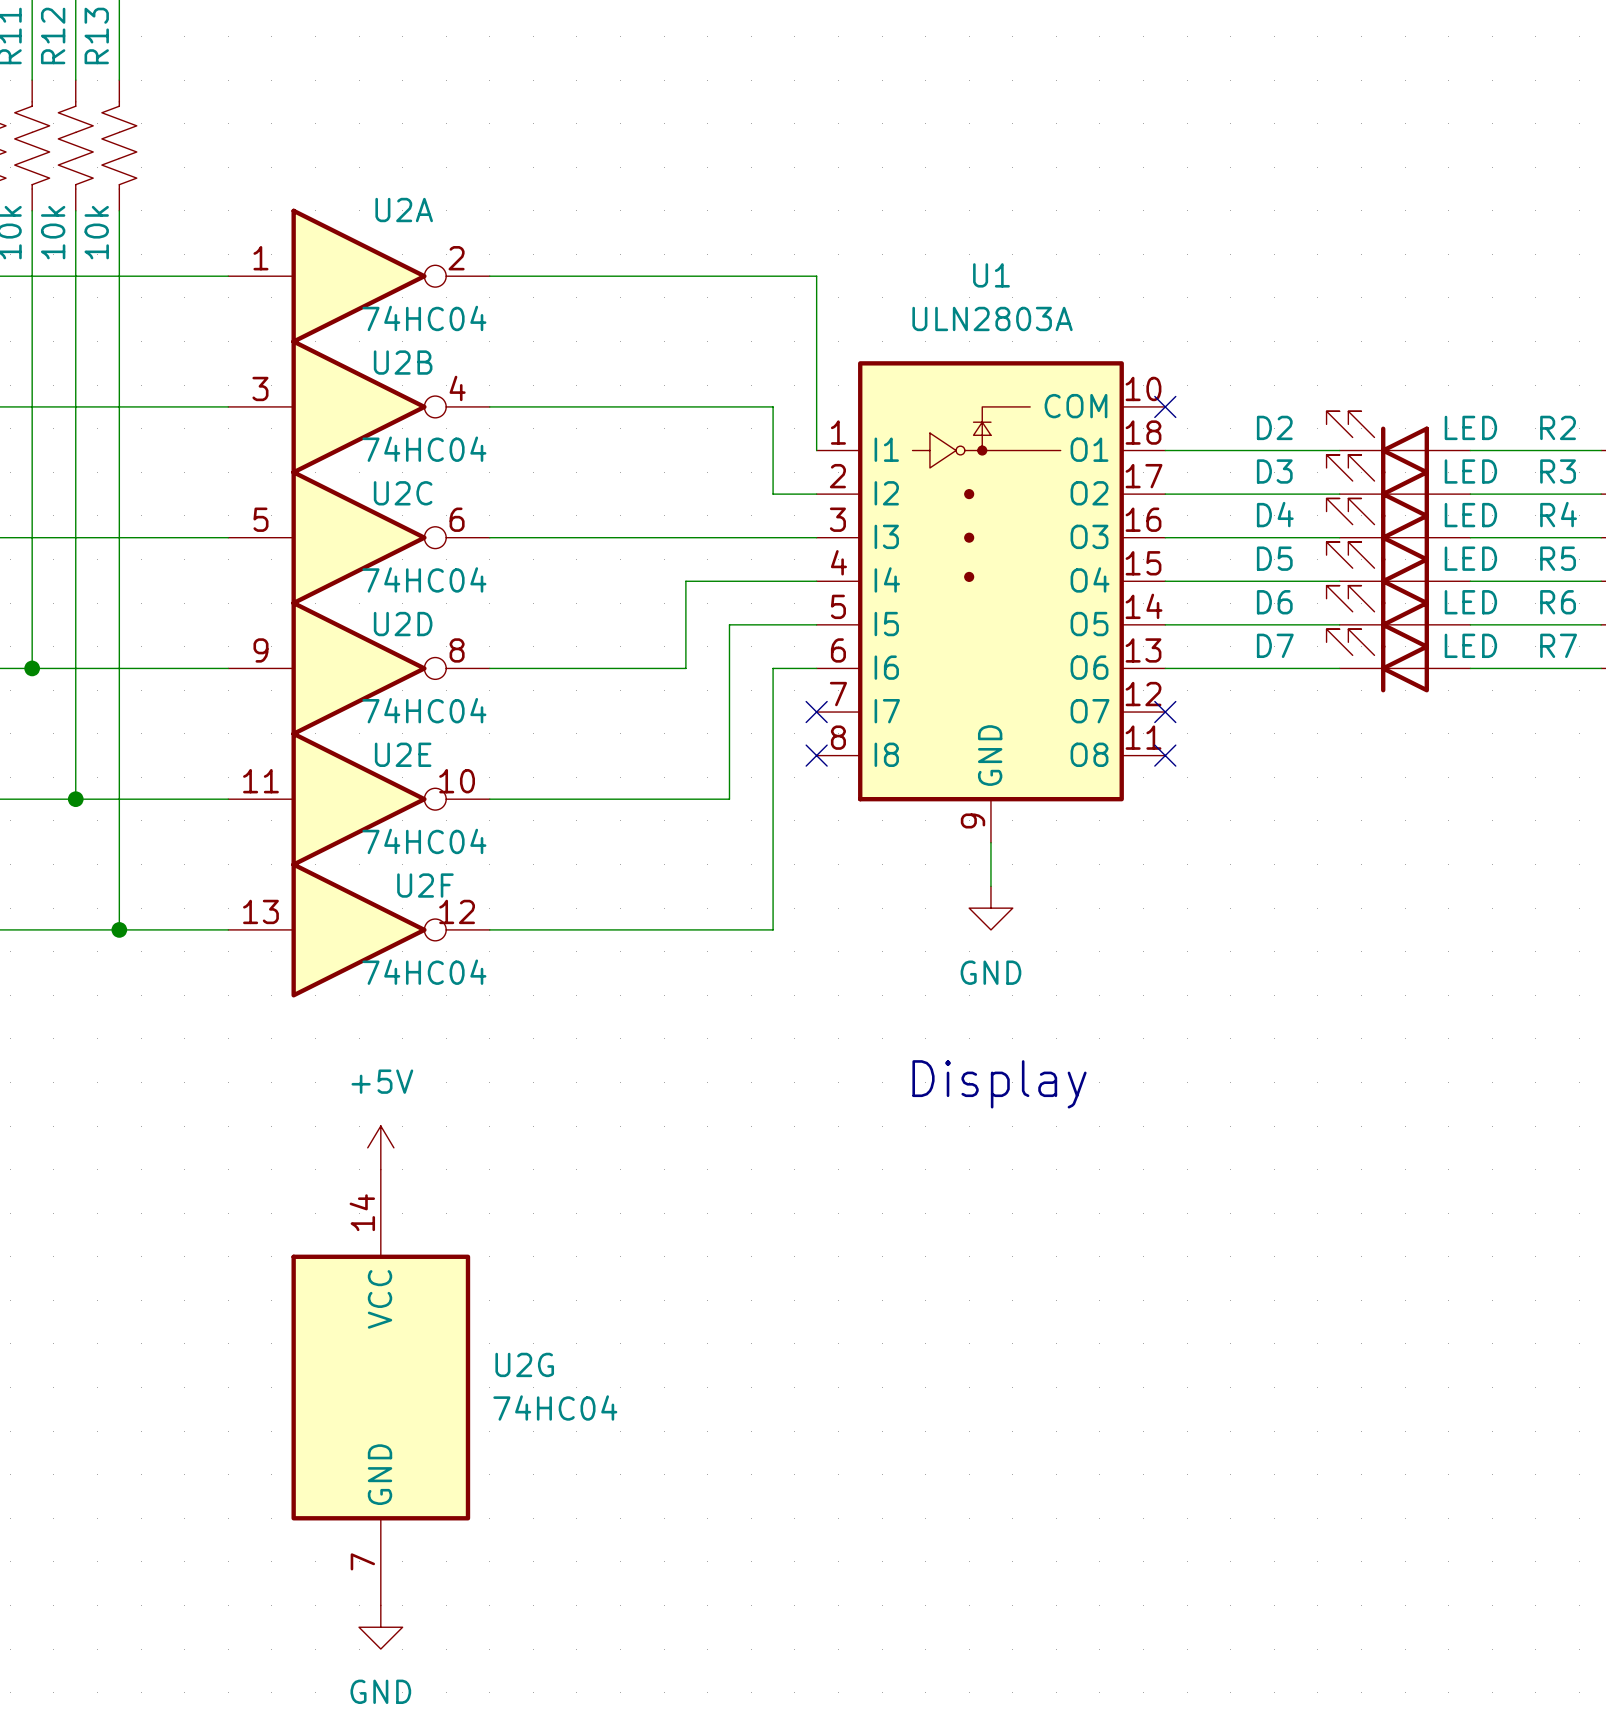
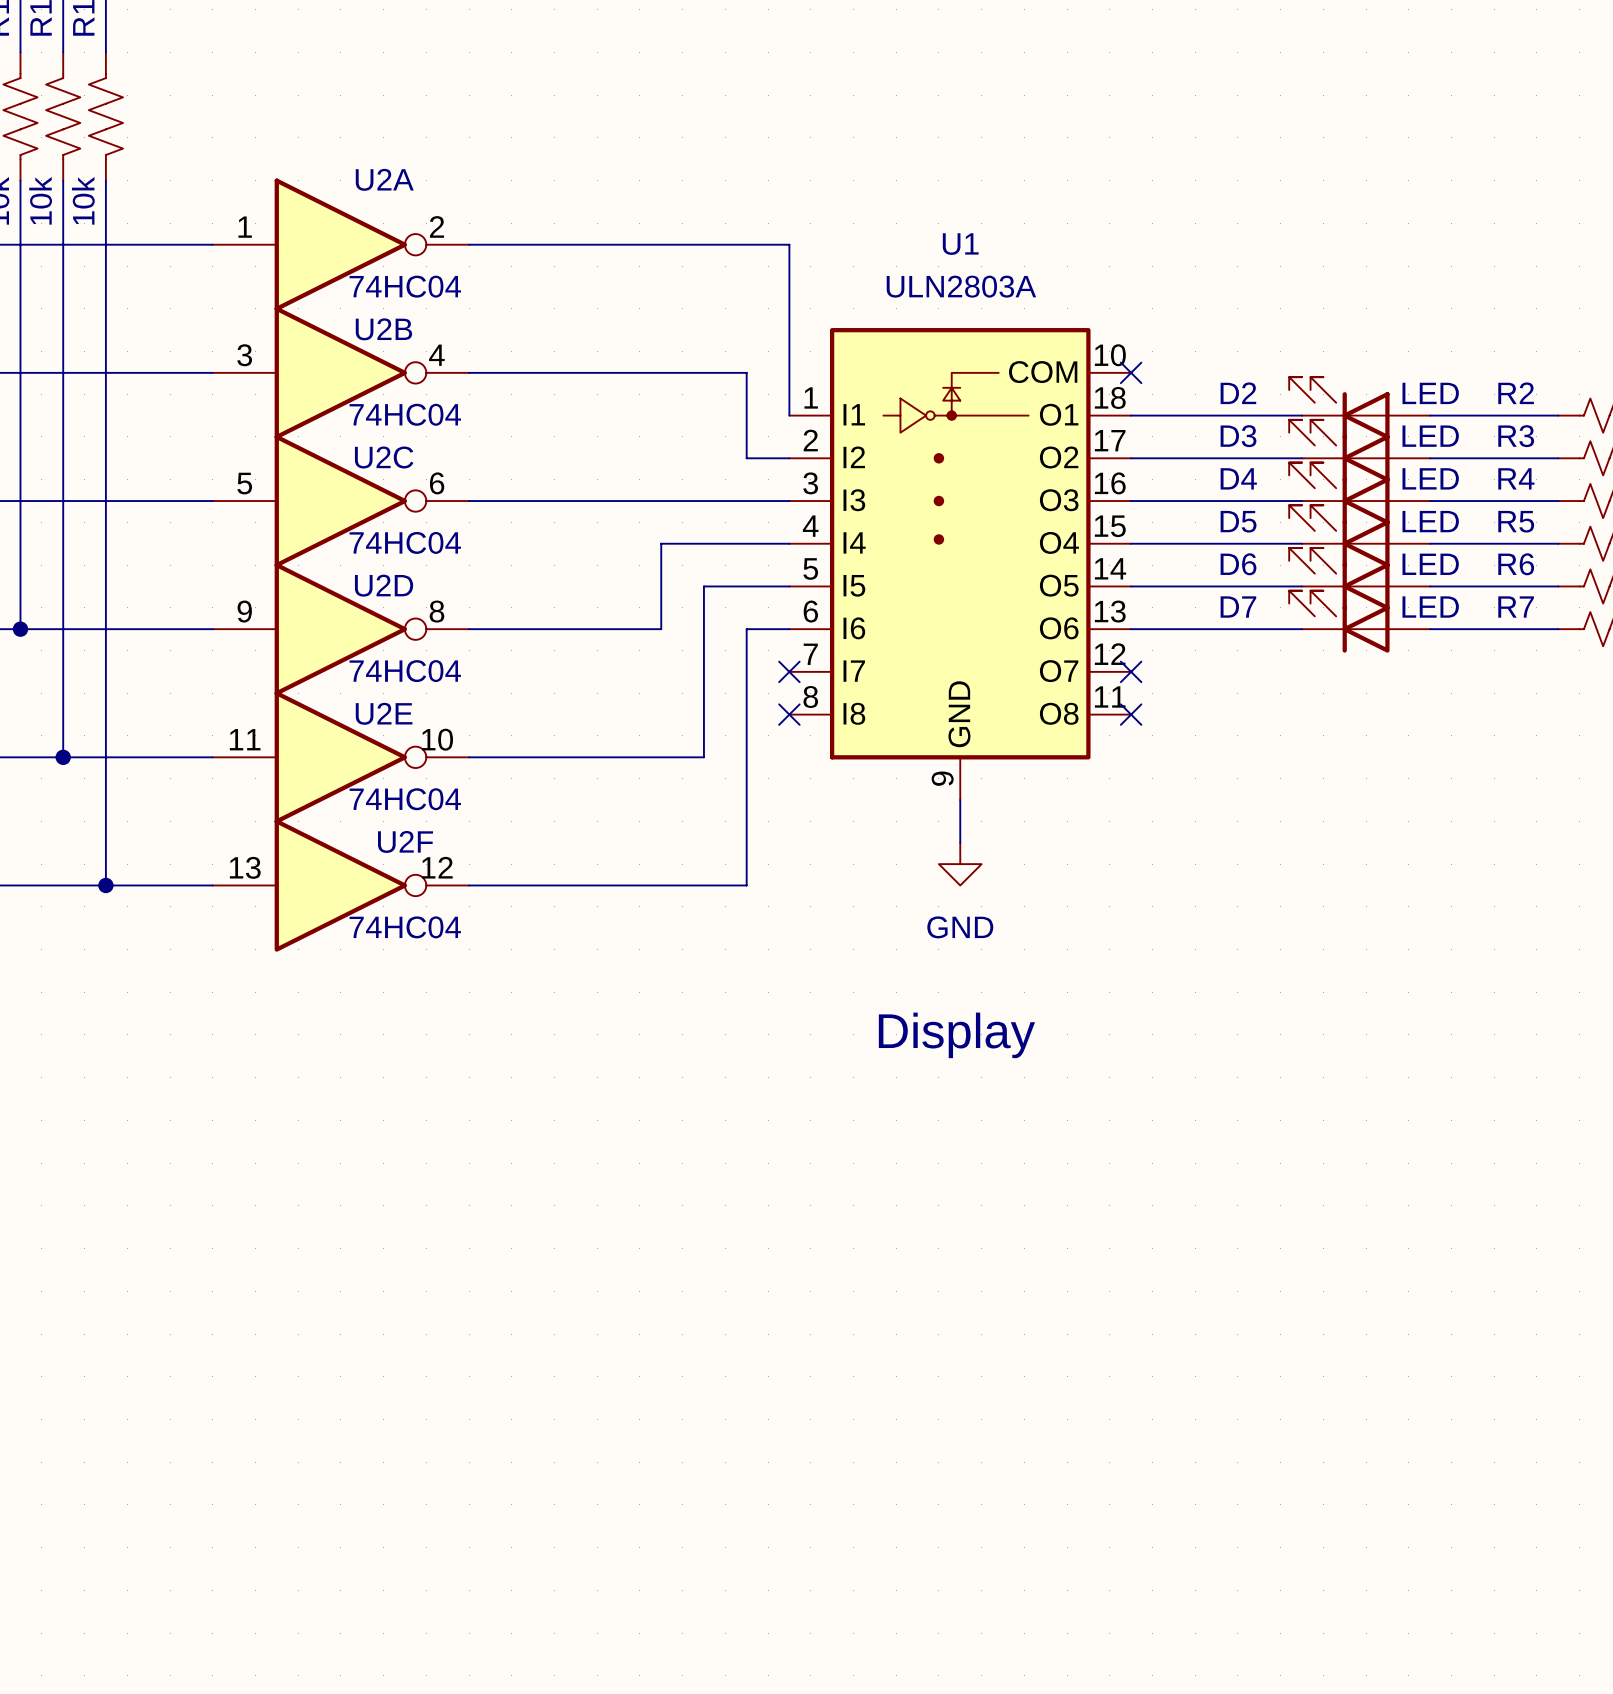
power symbol: +5V (380, 1147) -> none
U2G: 74HC04 (380, 1387) -> none
power symbol: GND (380, 1627) -> none

